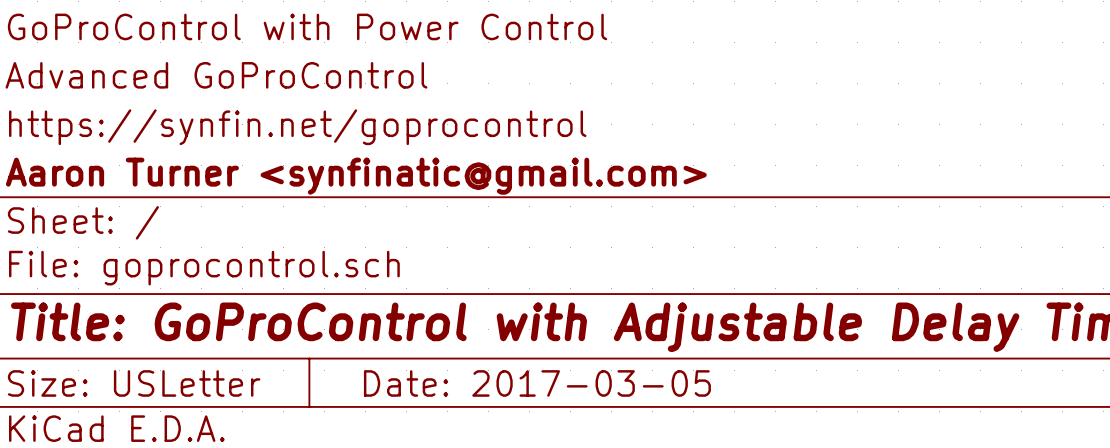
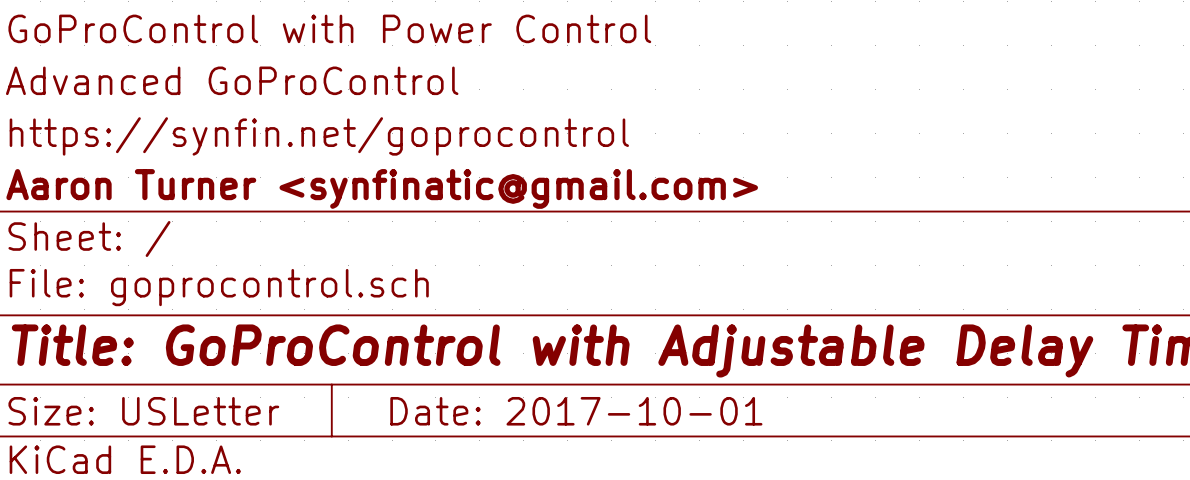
title block: Date: 2017-03-05 (537, 383) -> Date: 2017-10-01 (576, 411)

